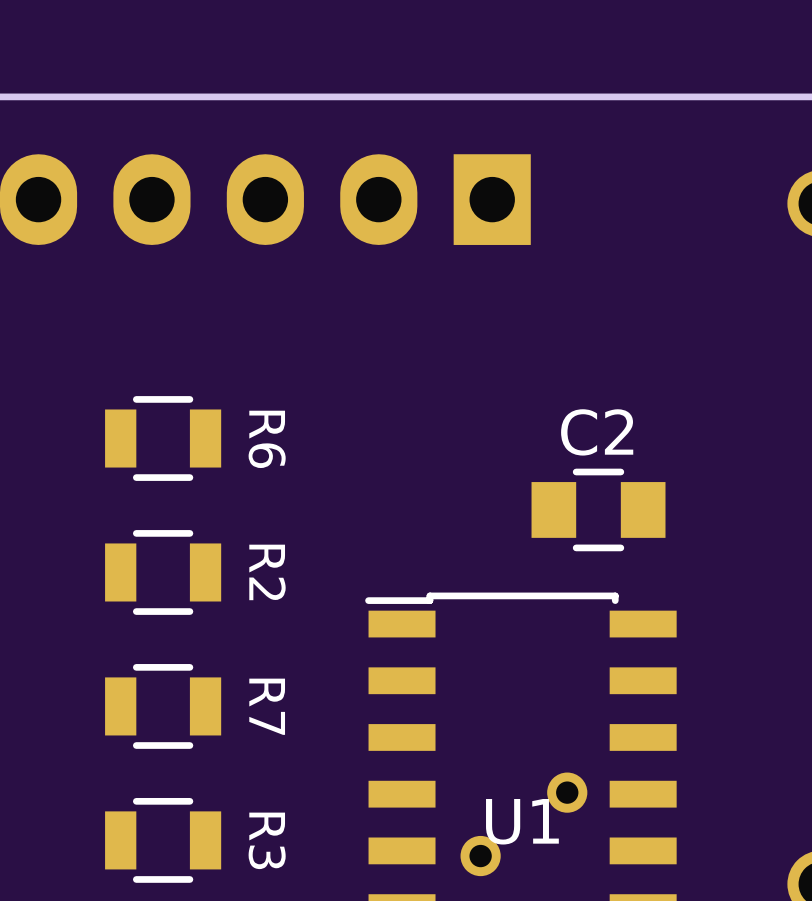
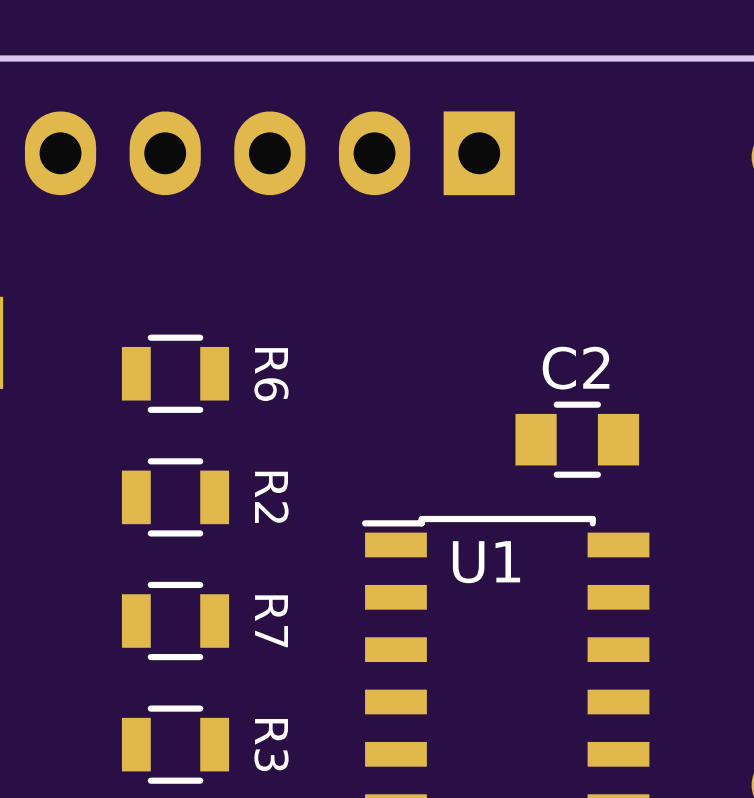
part: (567, 792) -> none
U1 name position: U1 (522, 821) -> U1 (486, 562)
part: (480, 856) -> none

